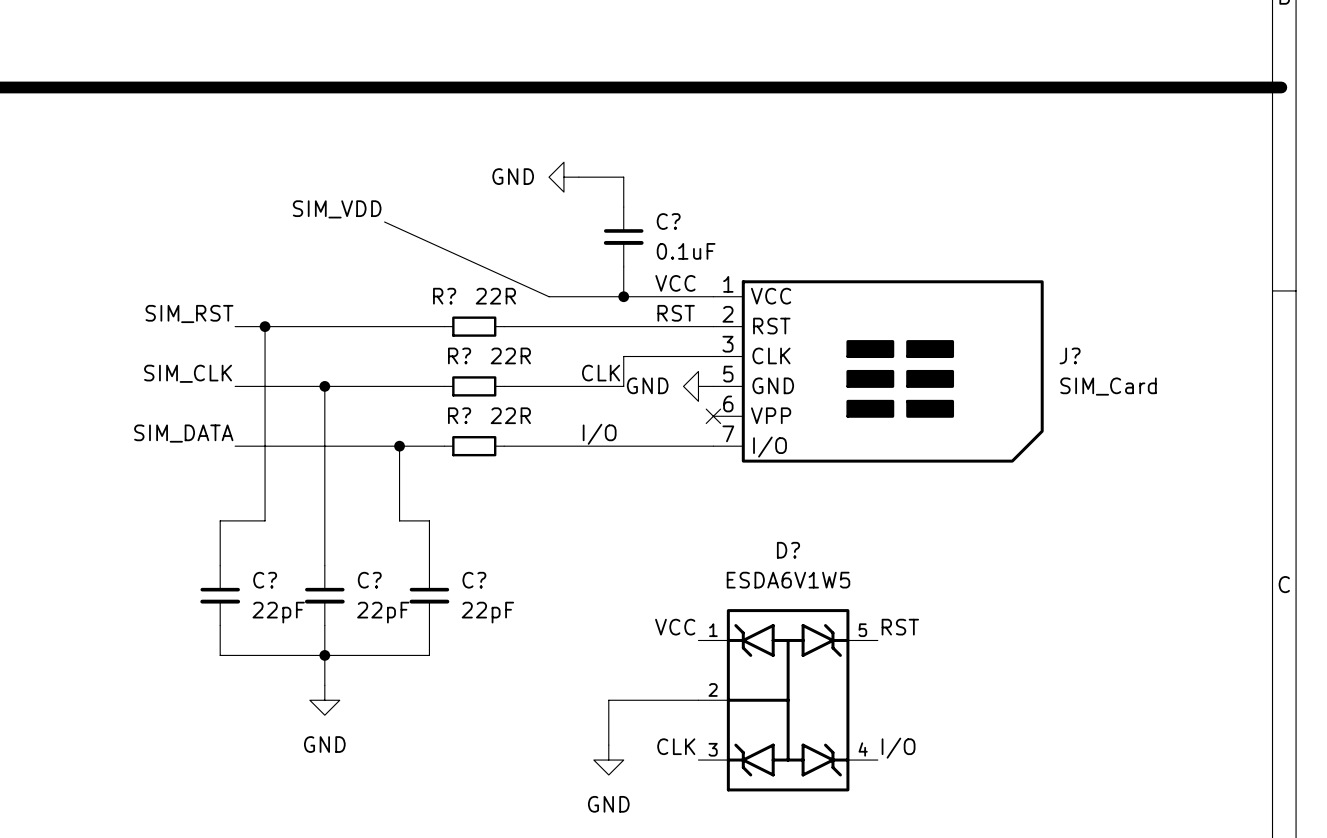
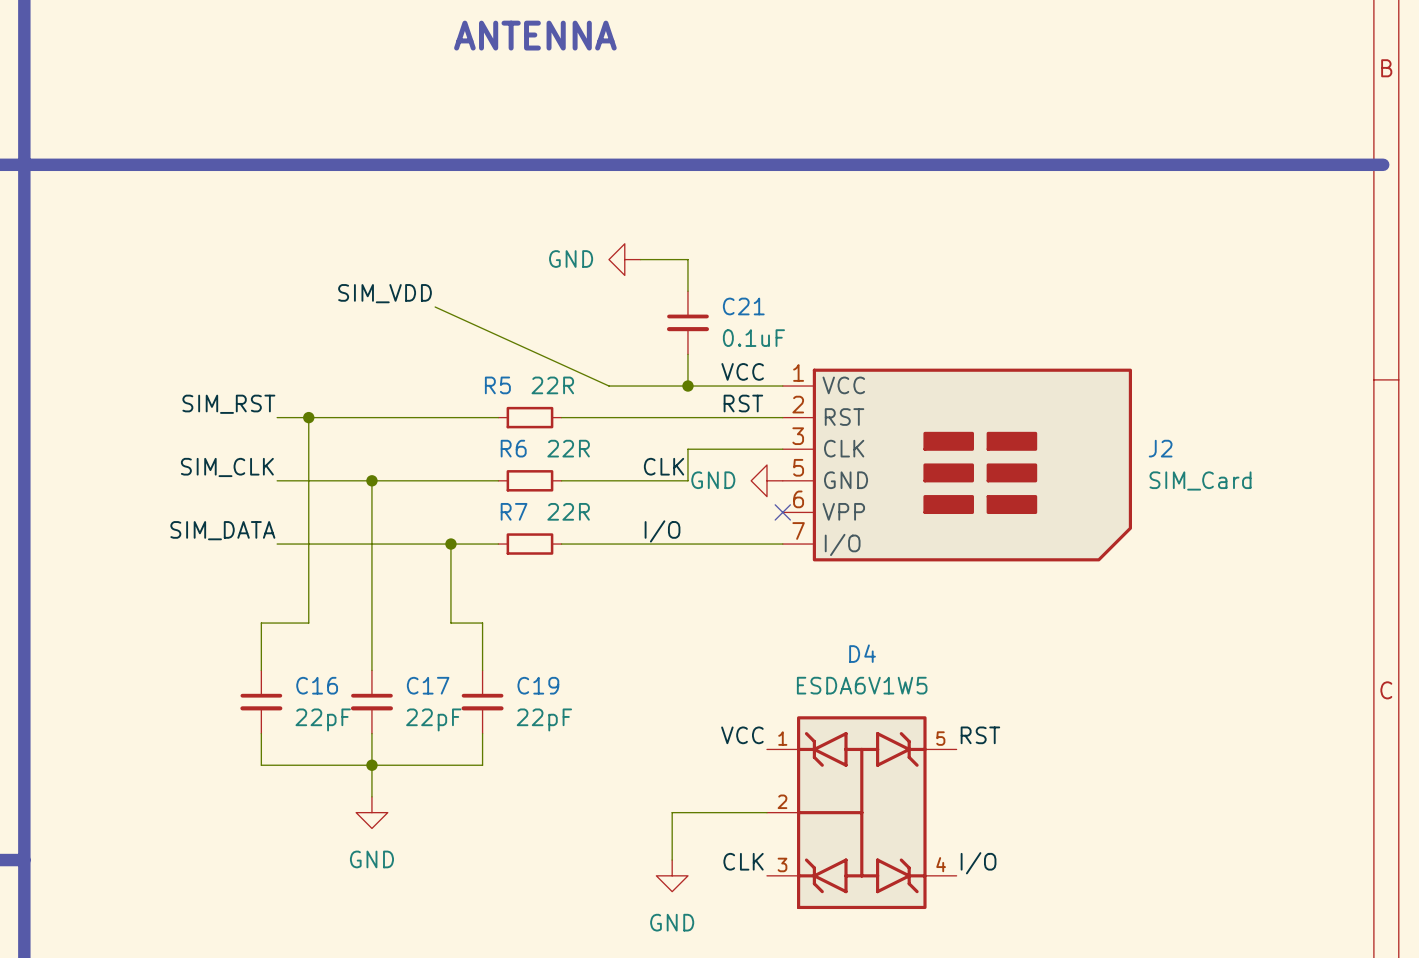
C? name: C? (668, 221) -> C21 (743, 306)
R? name: R? (444, 296) -> R5 (497, 385)
R? name: R? (459, 355) -> R6 (513, 448)
J? name: J? (1070, 355) -> J2 (1160, 448)
R? name: R? (459, 415) -> R7 (514, 511)
D? name: D? (788, 550) -> D4 (862, 653)
C? name: C? (265, 580) -> C16 (317, 685)
C? name: C? (369, 580) -> C17 (428, 685)
C? name: C? (474, 580) -> C19 (538, 685)

